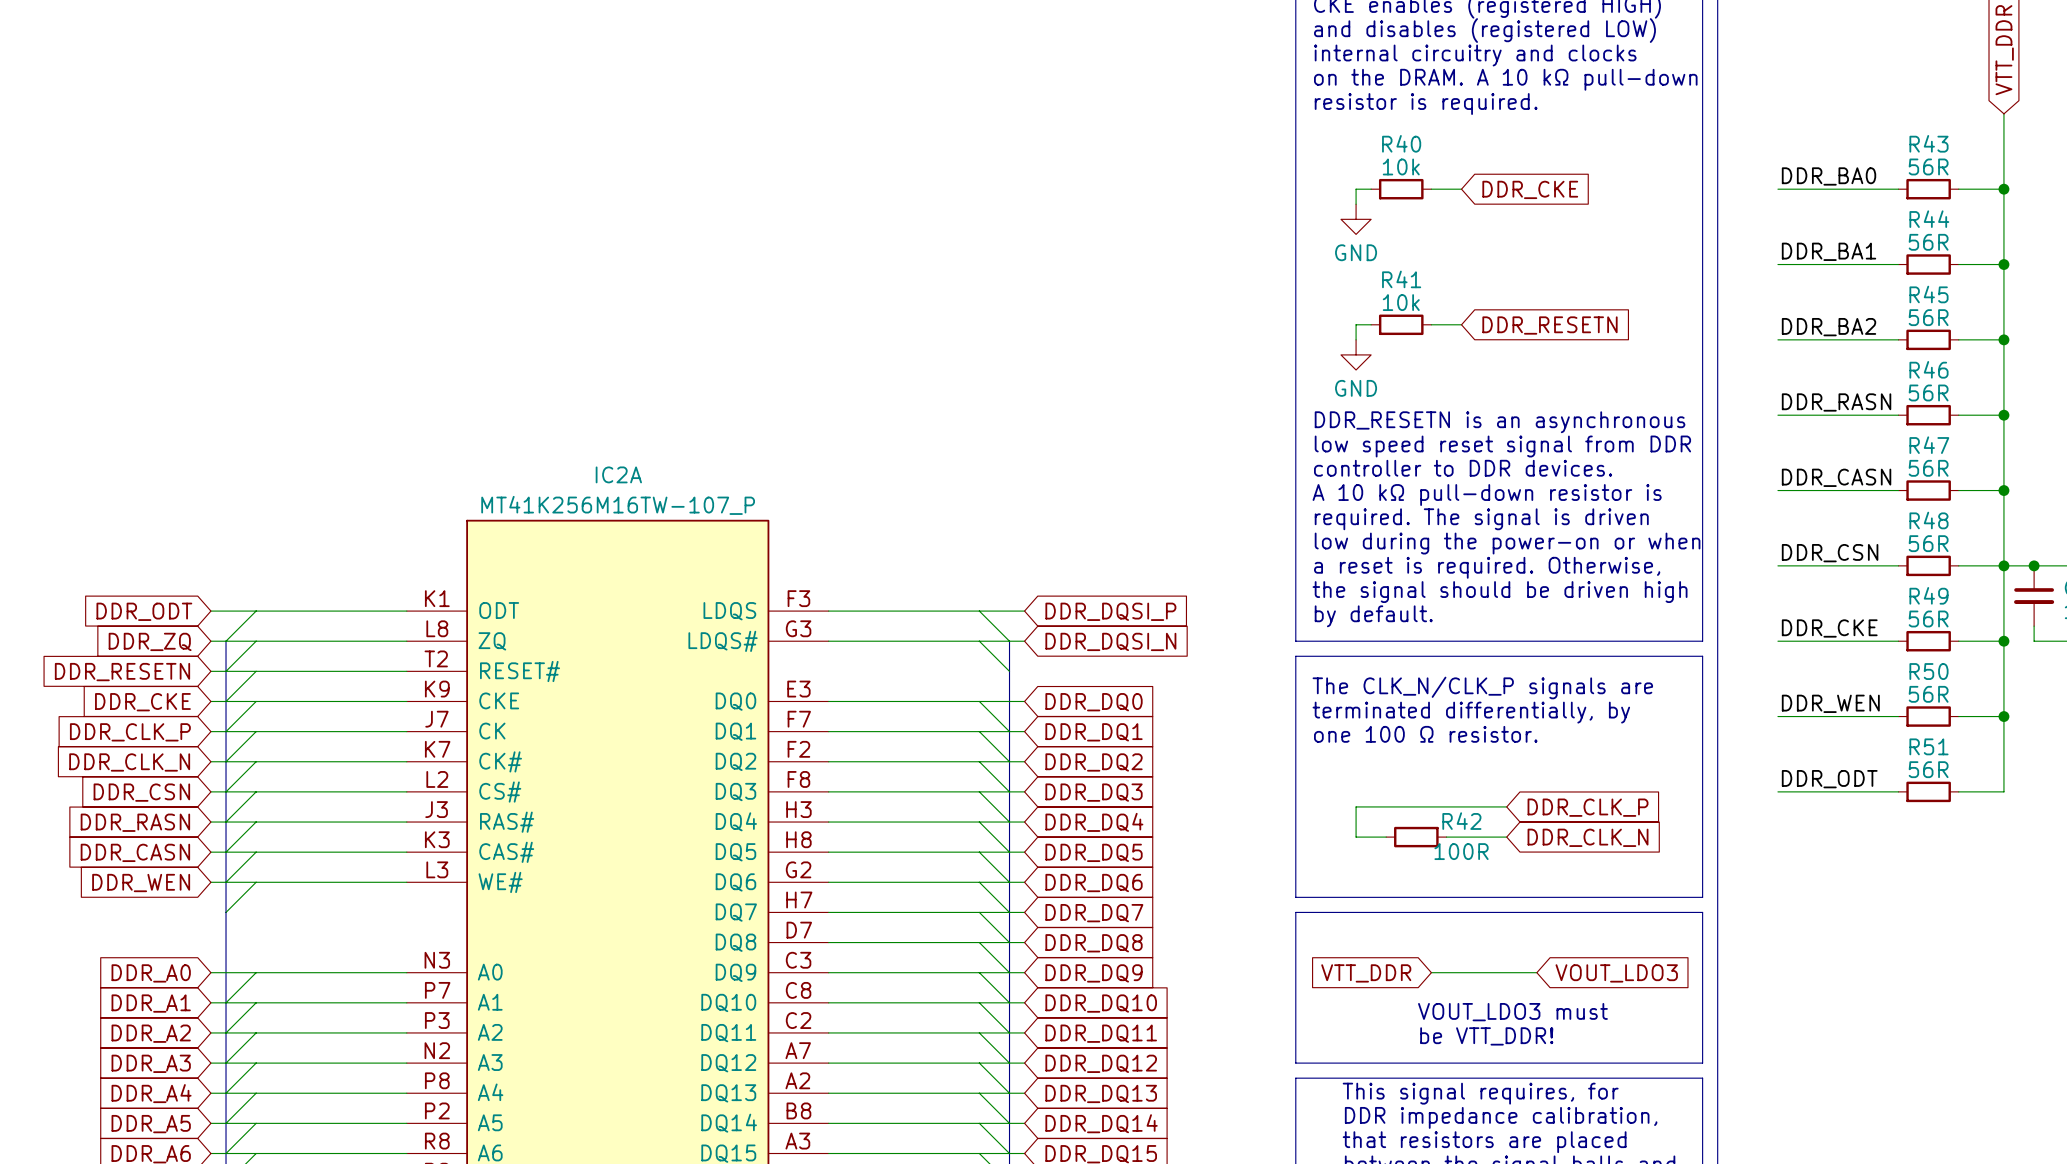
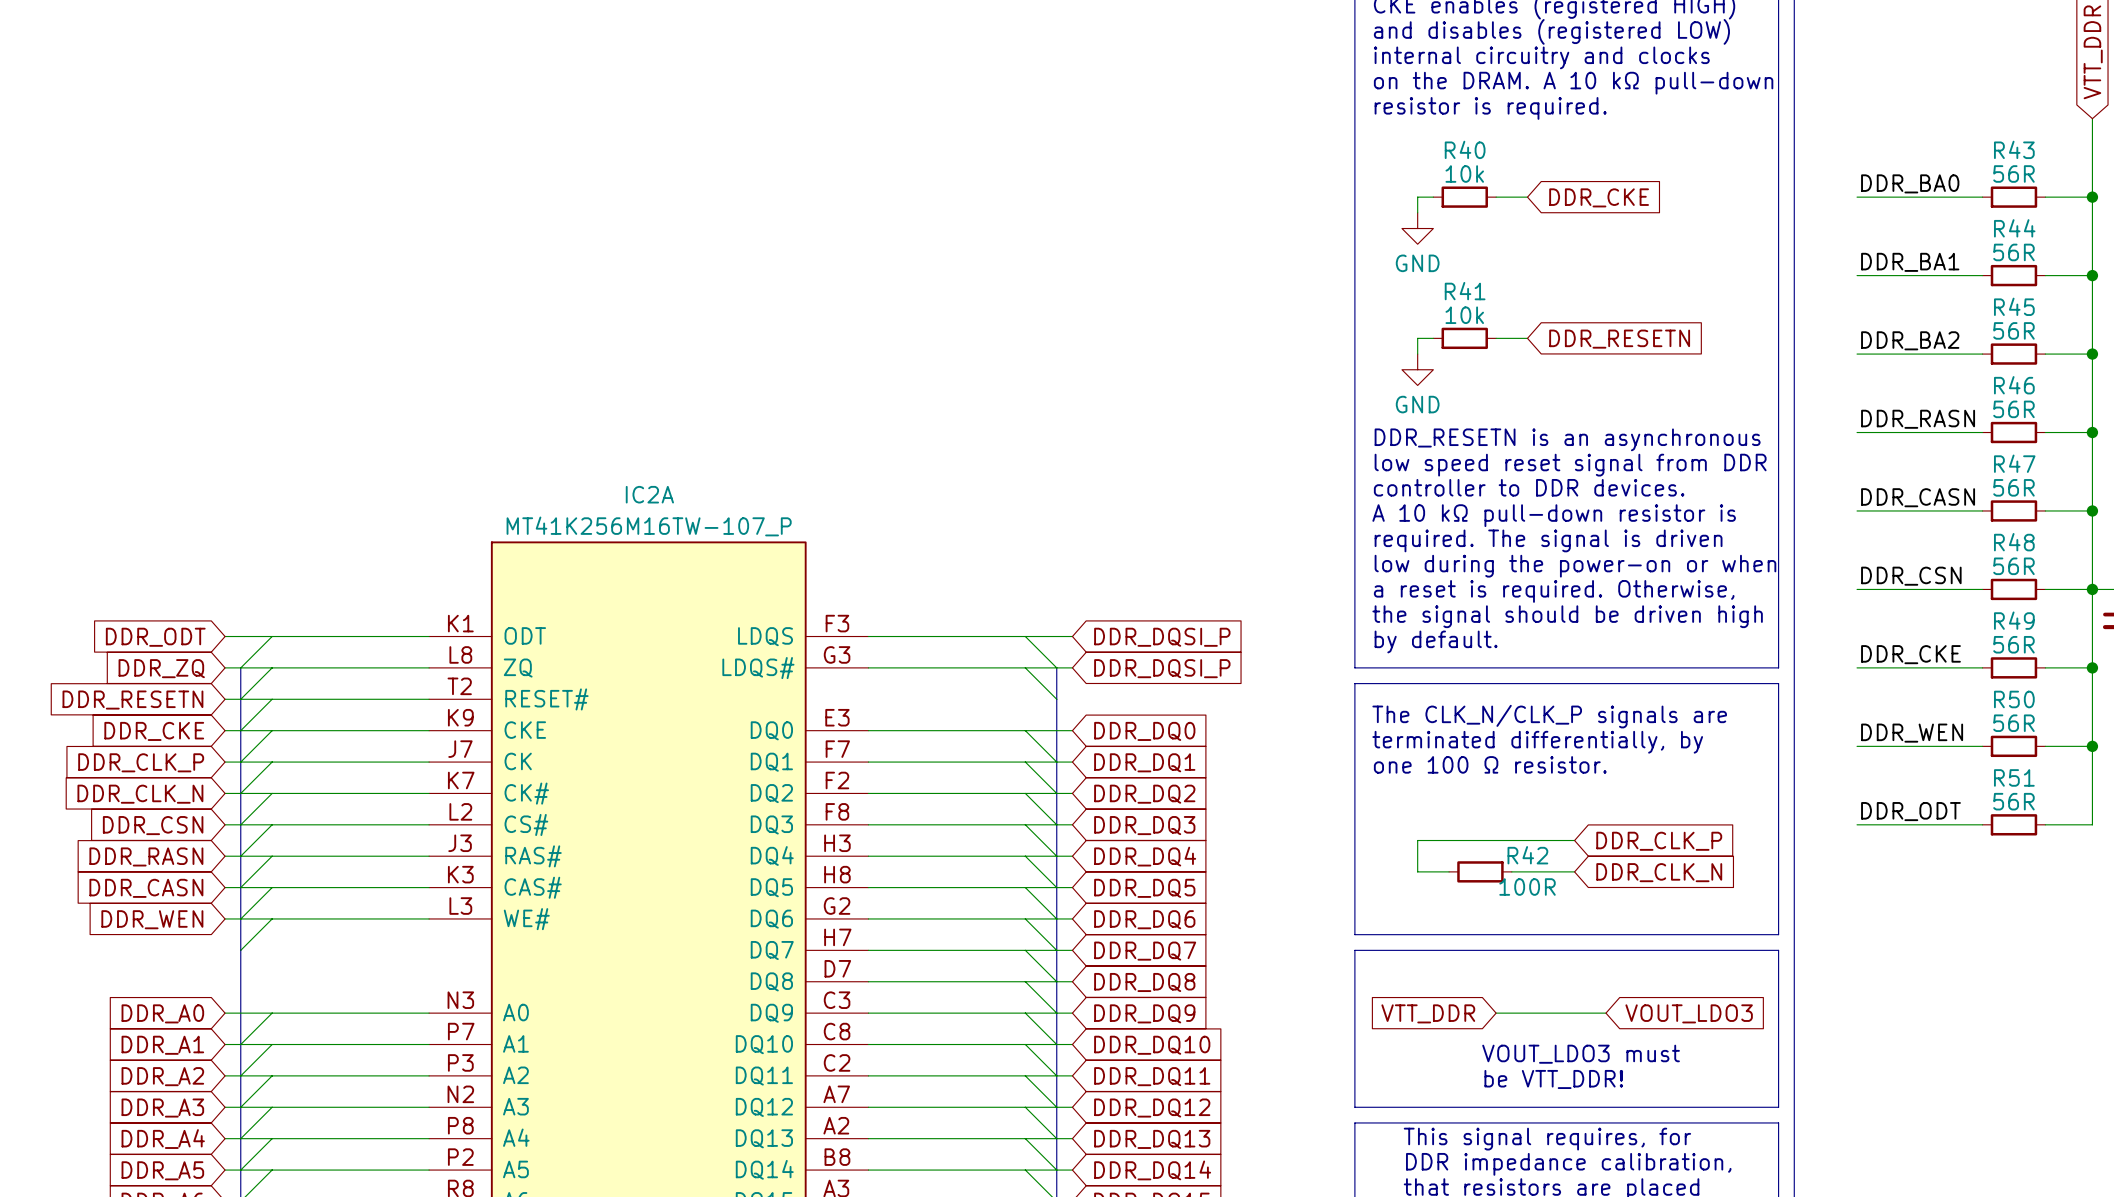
global label: DDR_DQSI_N (1110, 641) -> DDR_DQSI_P (1162, 668)

